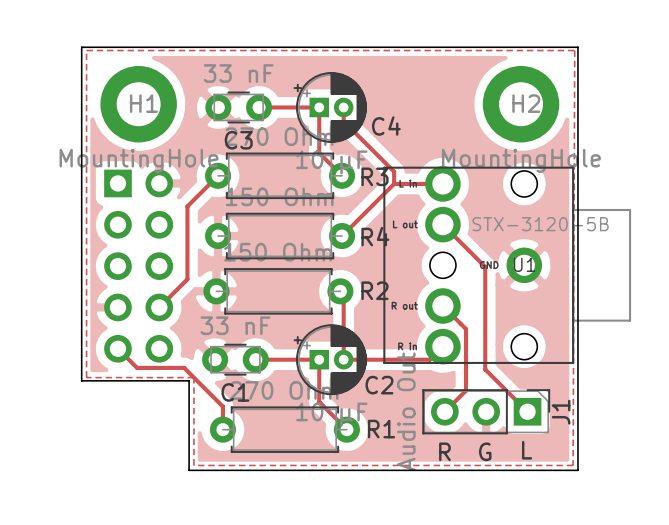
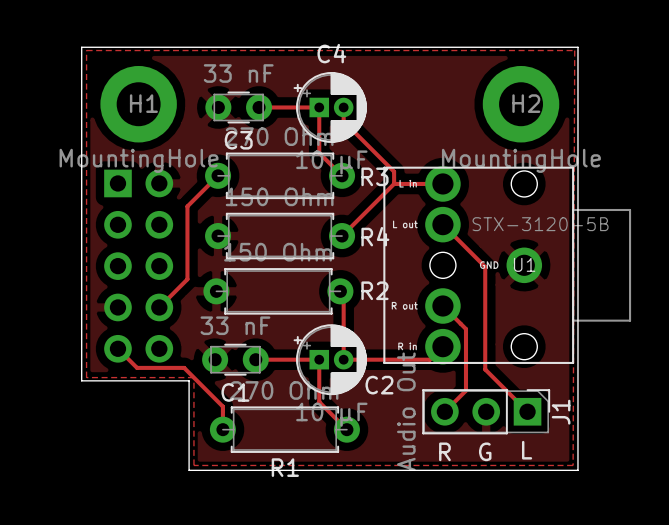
C4 name position: C4 (386, 126) -> C4 (331, 53)
R1 name position: R1 (381, 429) -> R1 (285, 467)

